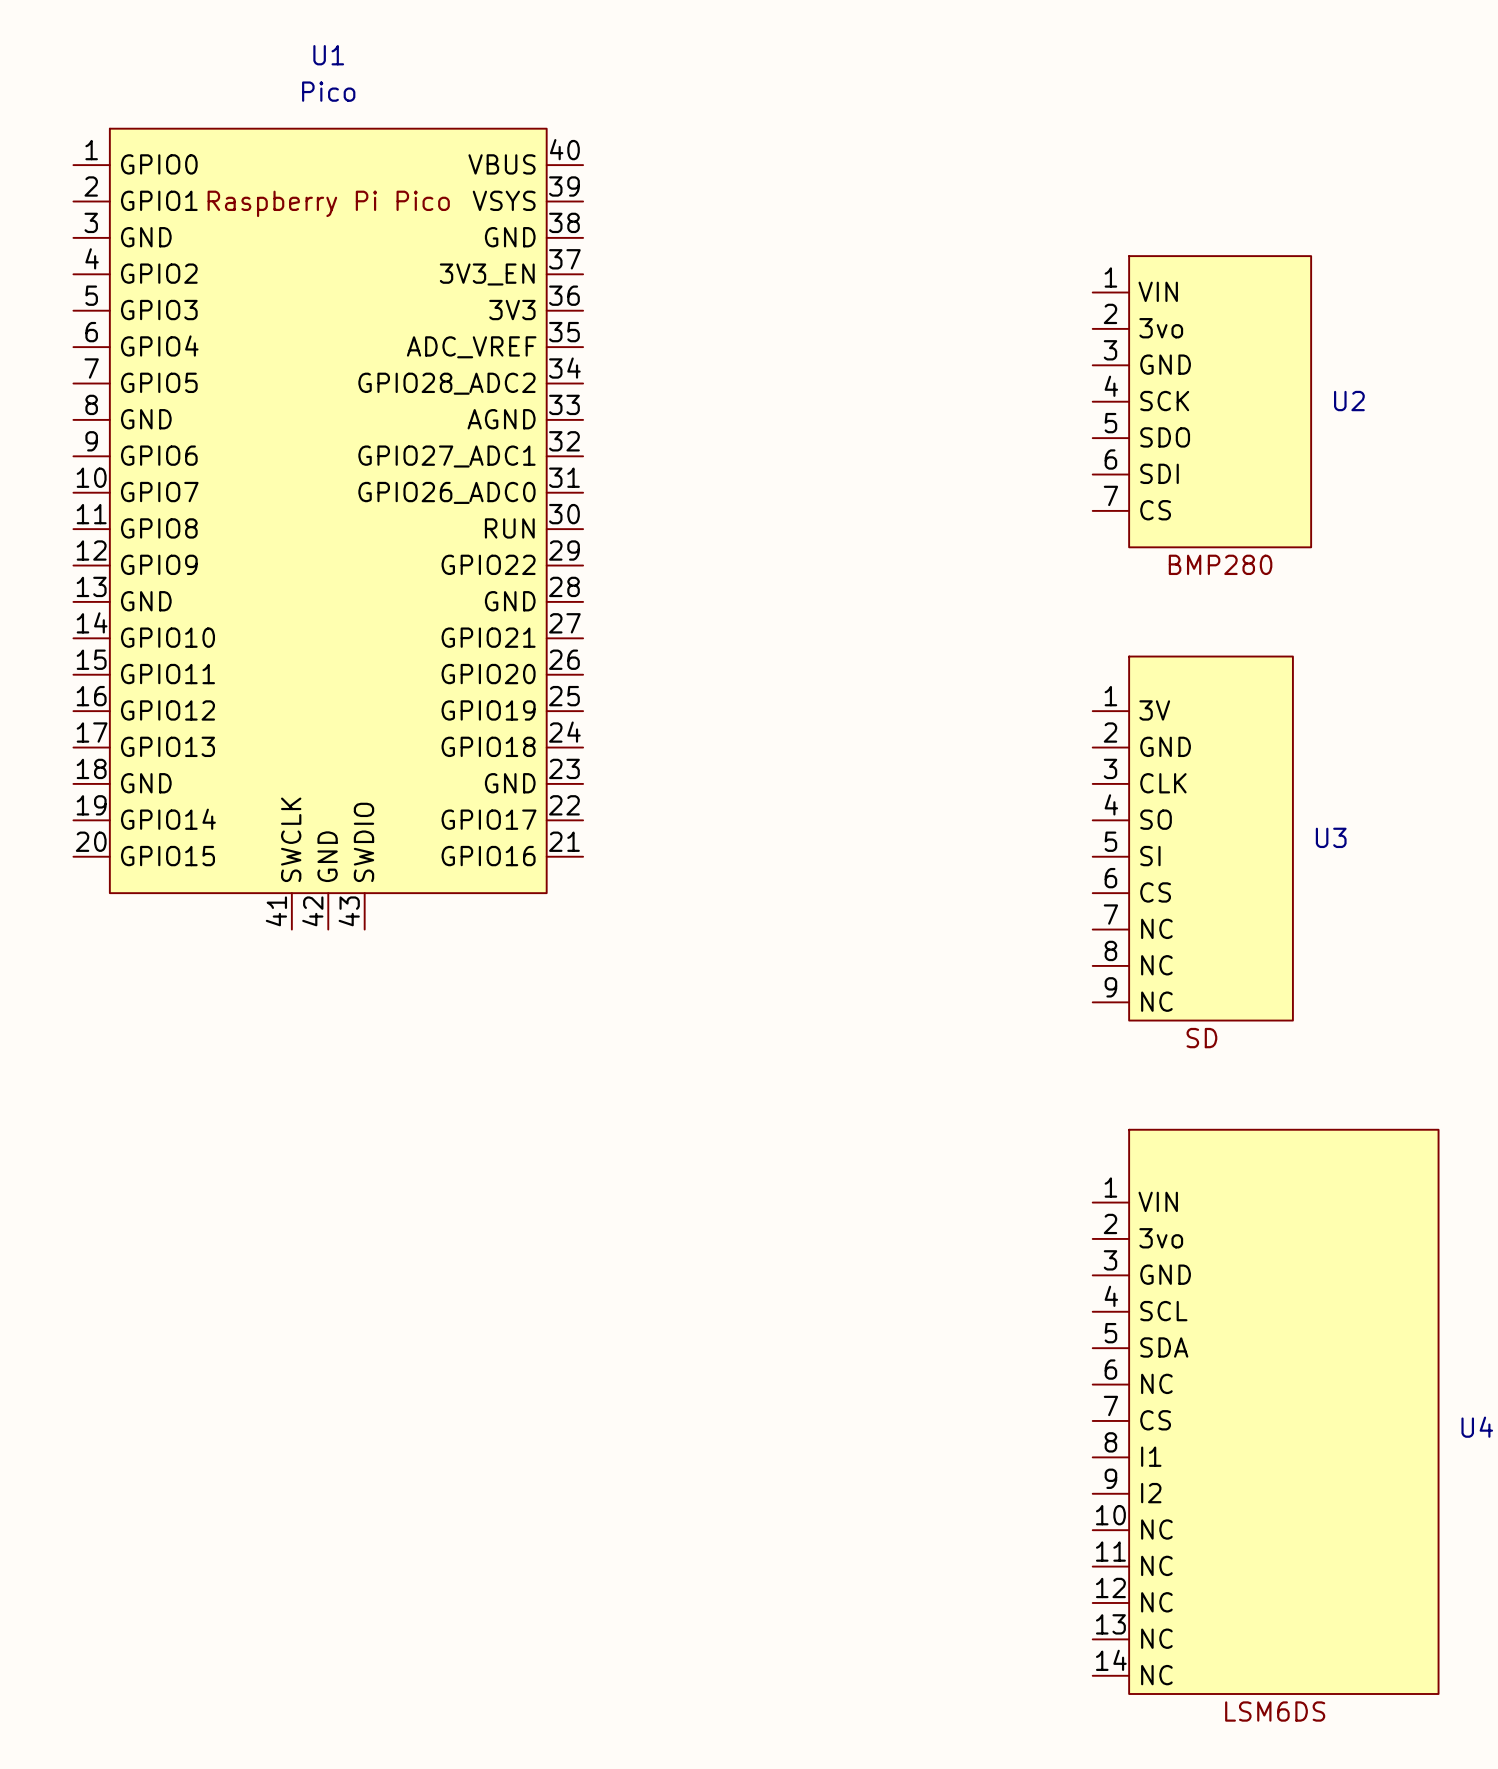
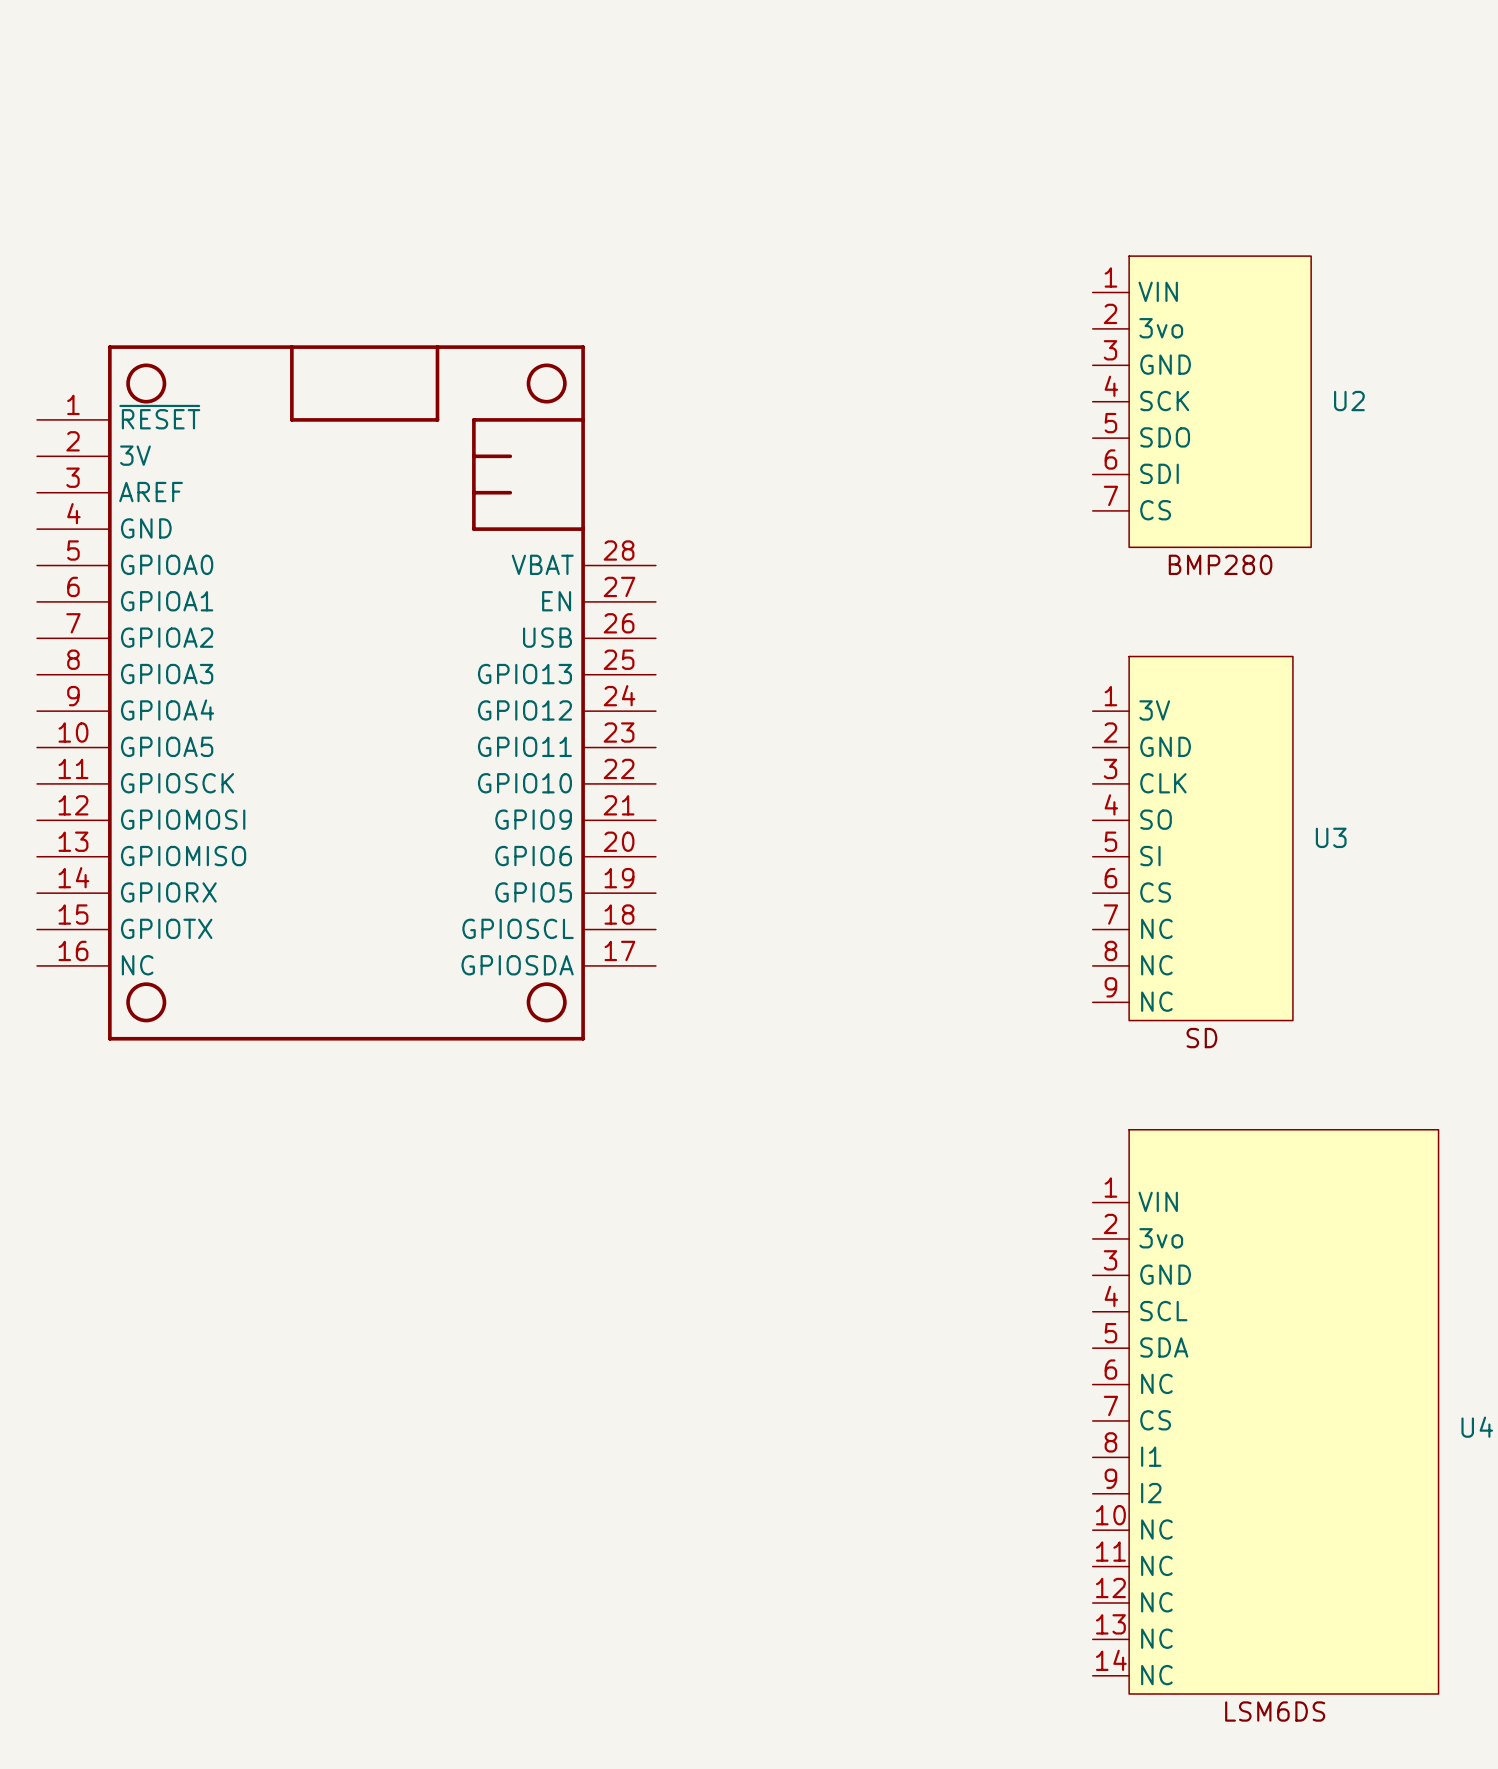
U1: Pico (328, 529) -> none
part: none -> (346, 692)

